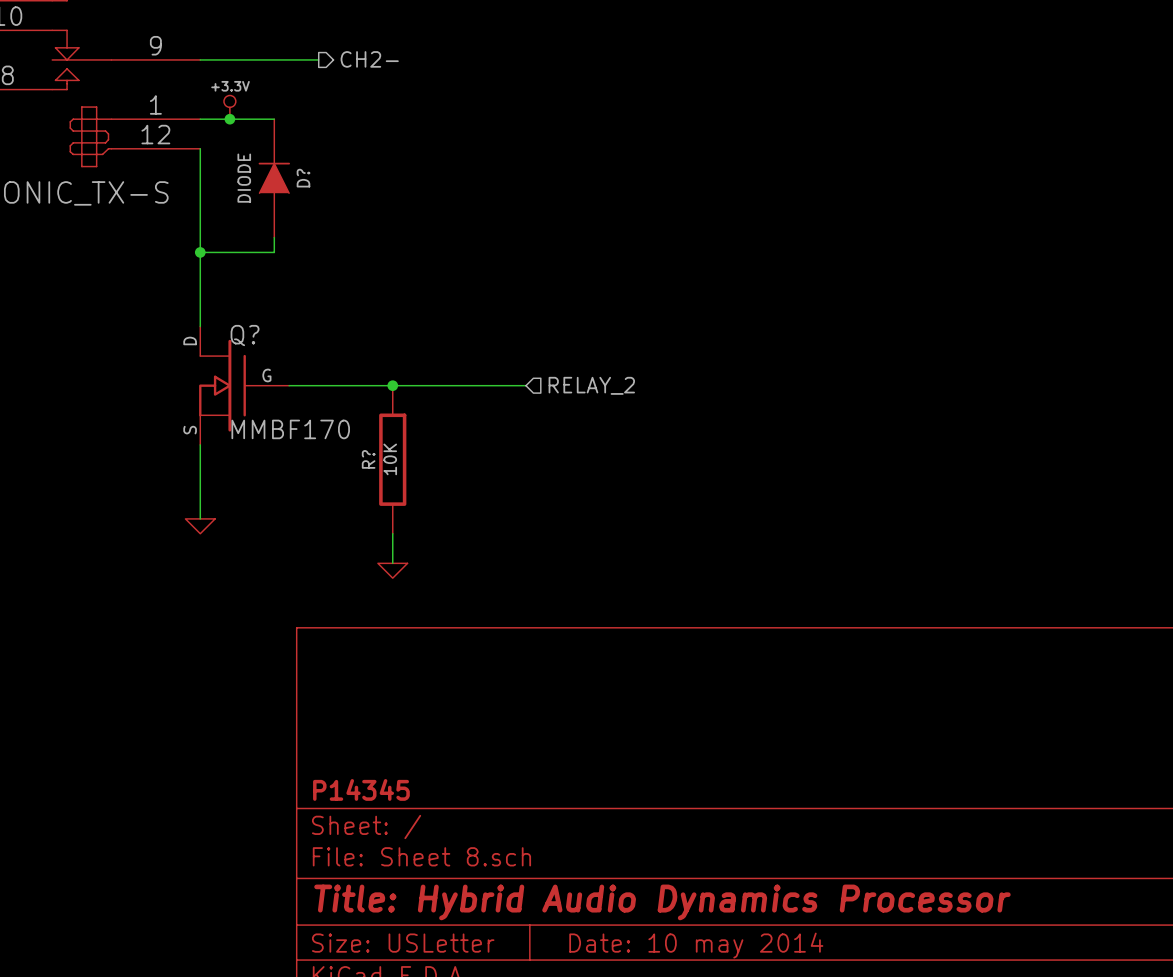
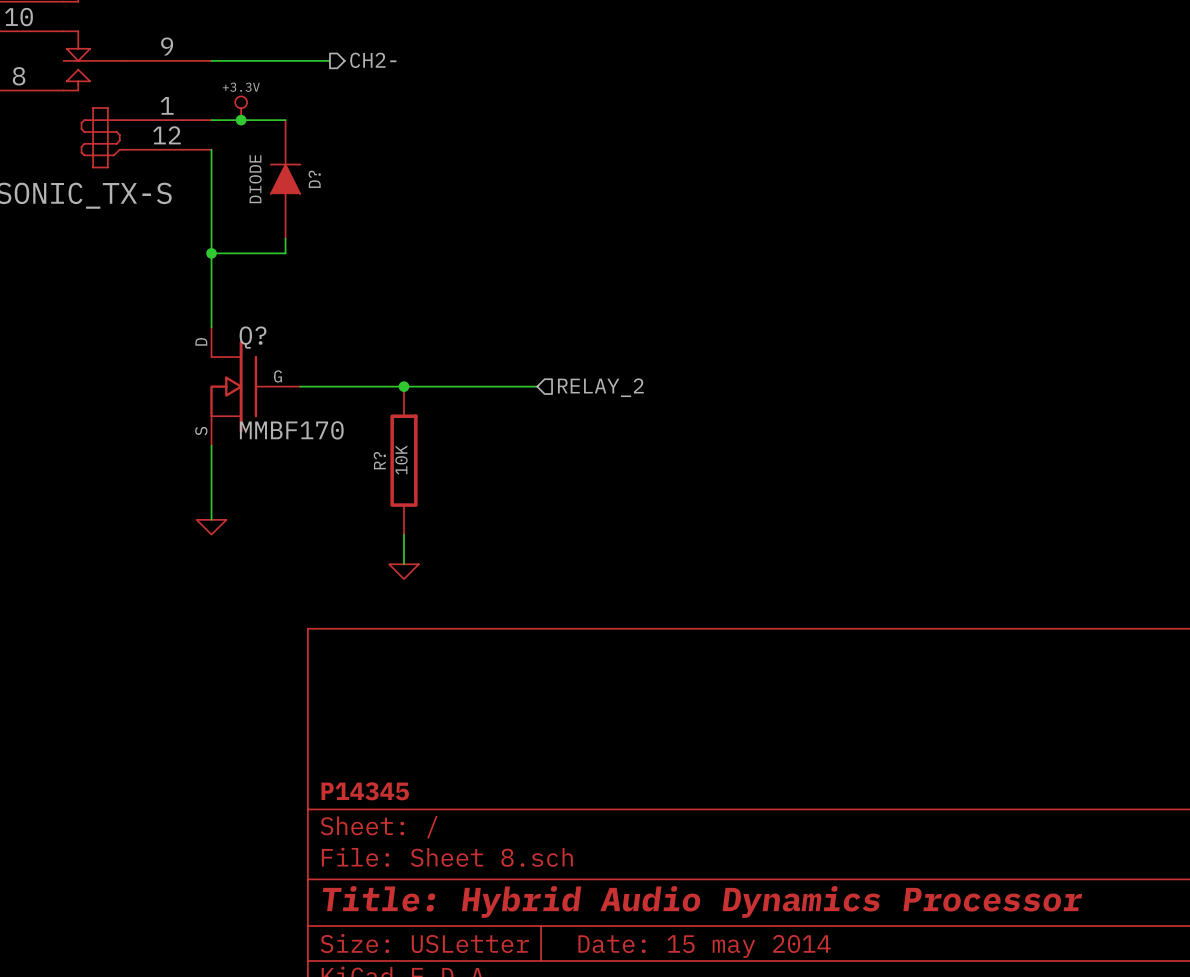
title block: Date: 10 may 2014 (696, 945) -> Date: 15 may 2014 (704, 946)

